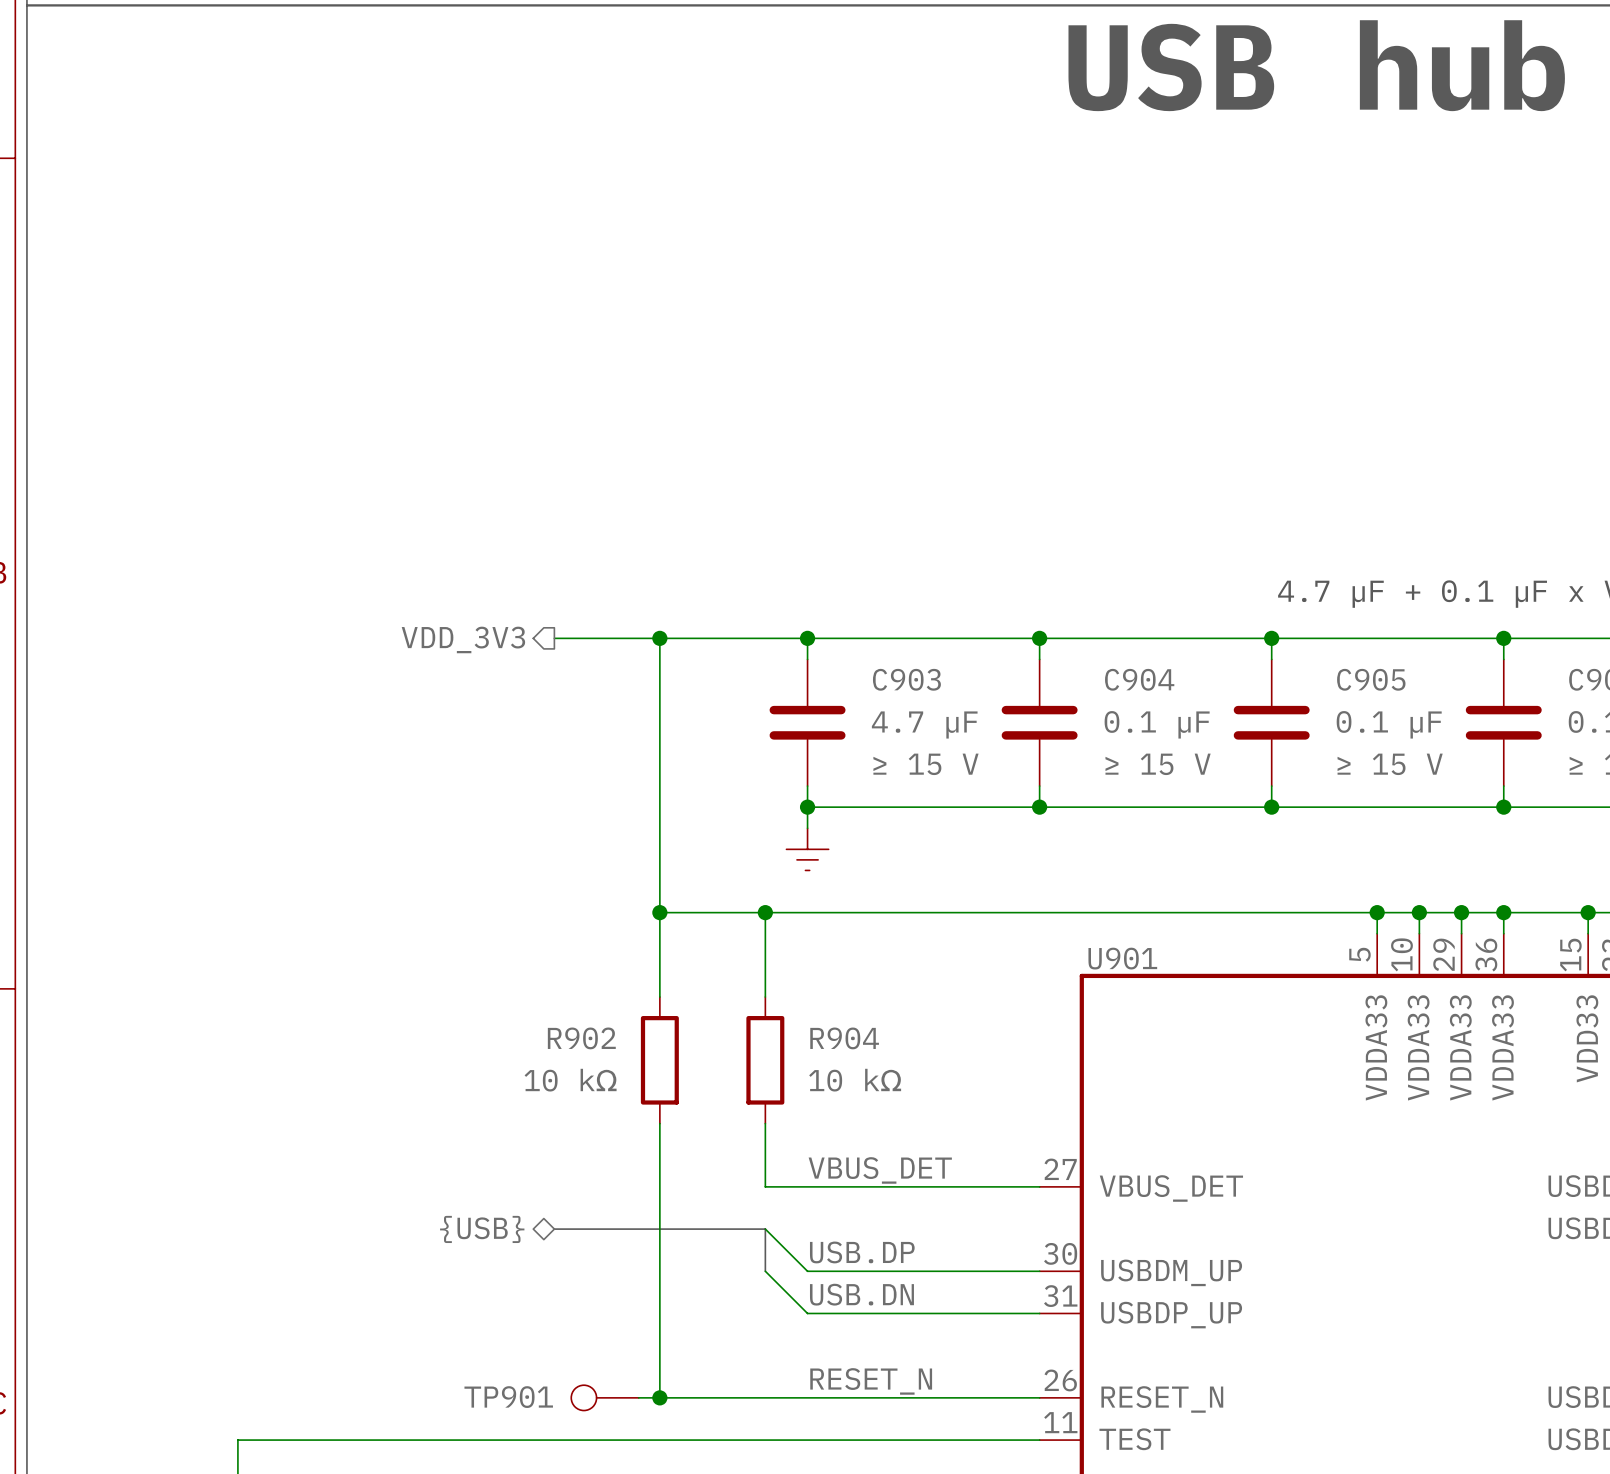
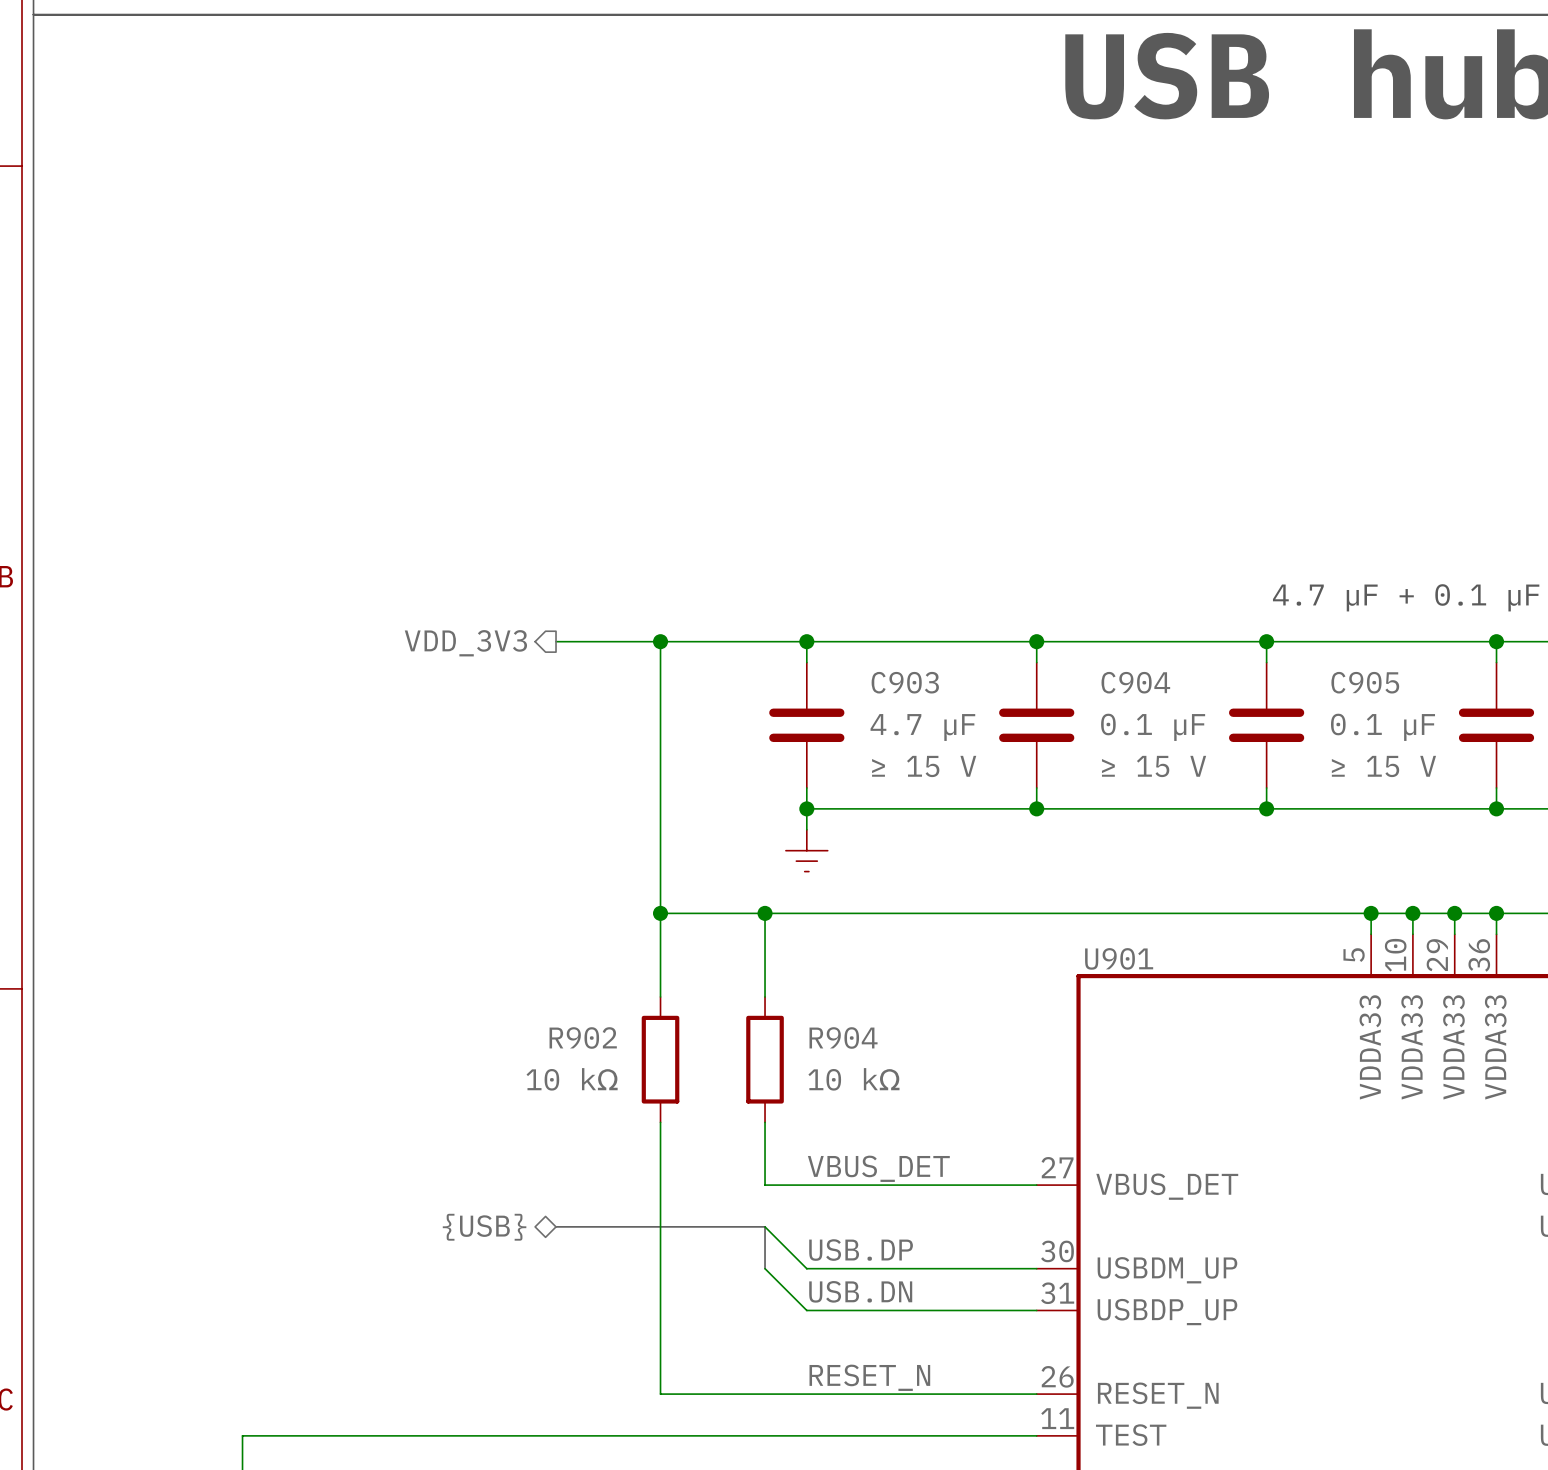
TP901: (605, 1397) -> none
wire: (638, 1397) (659, 1397) -> none
junction: (659, 1397) -> none

